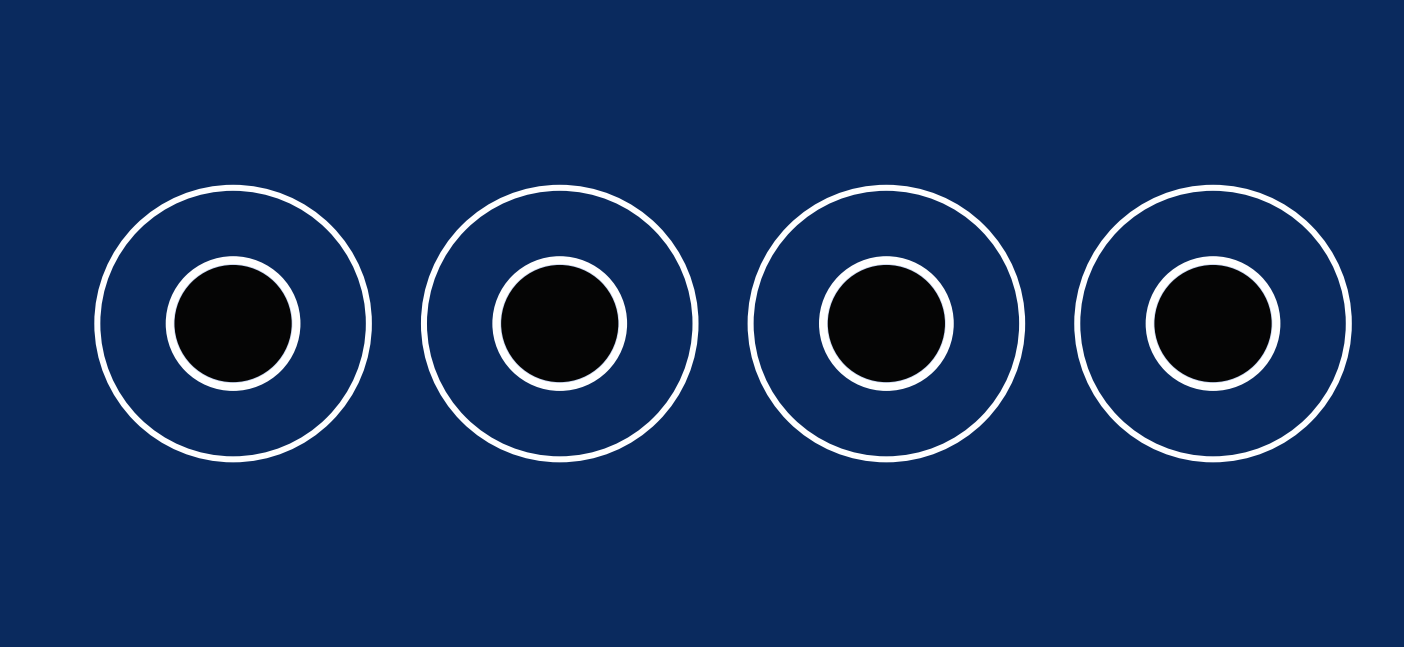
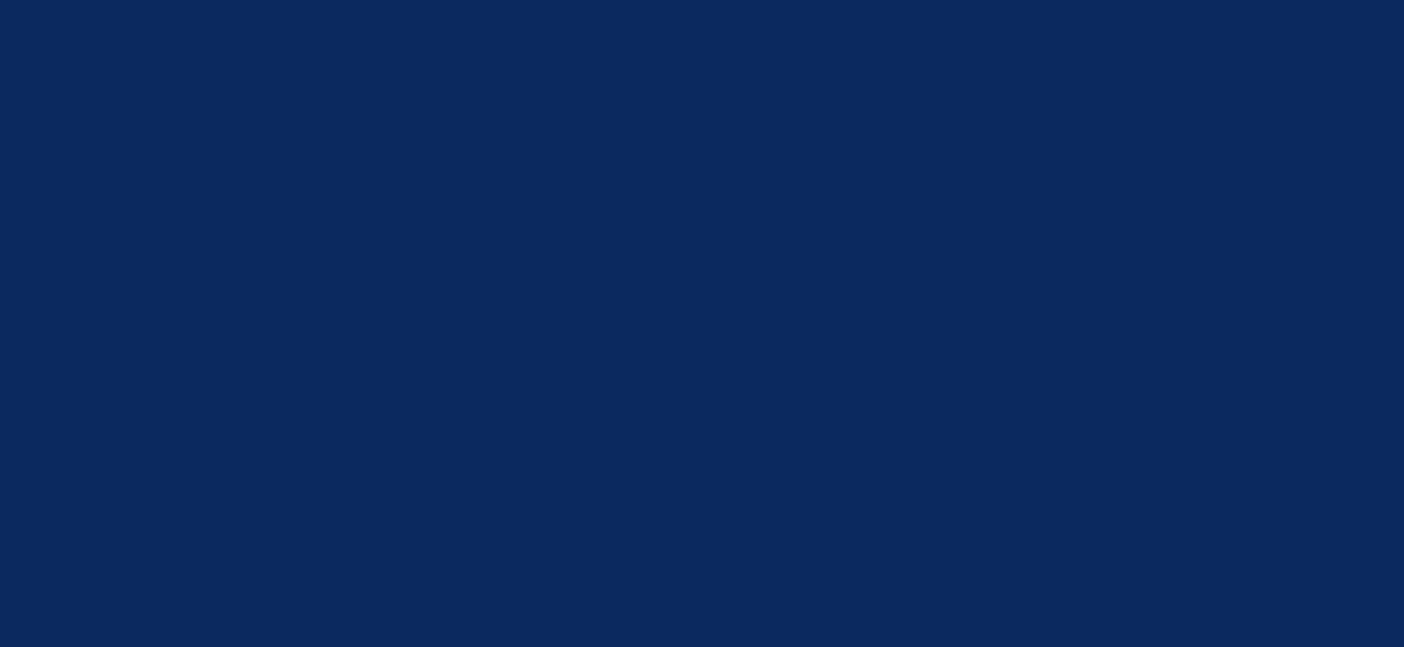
part: (233, 323) -> none
part: (559, 323) -> none
part: (886, 323) -> none
part: (1213, 323) -> none

